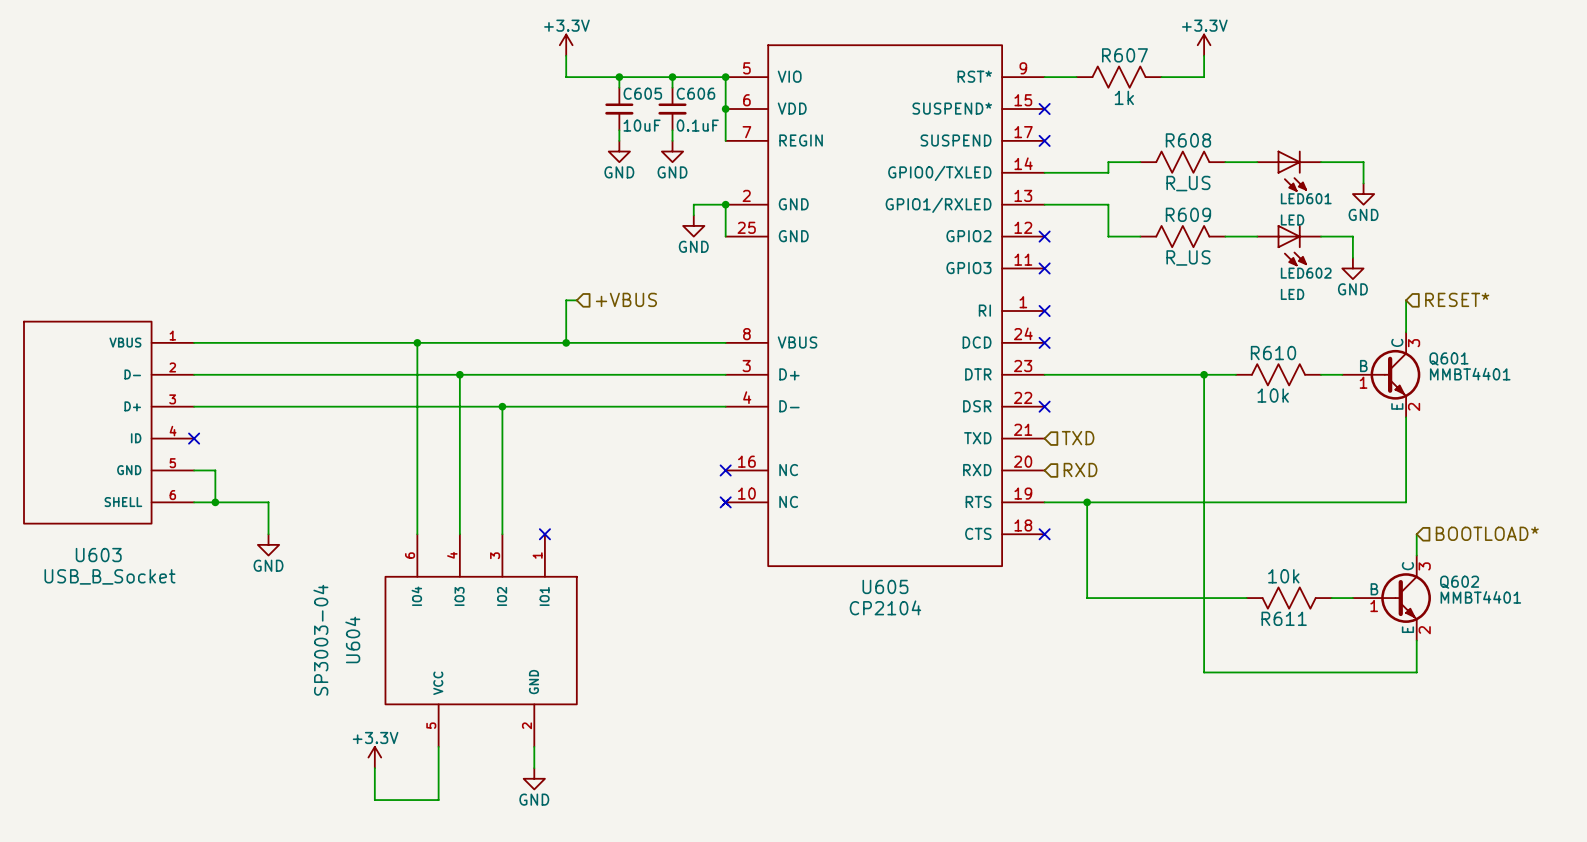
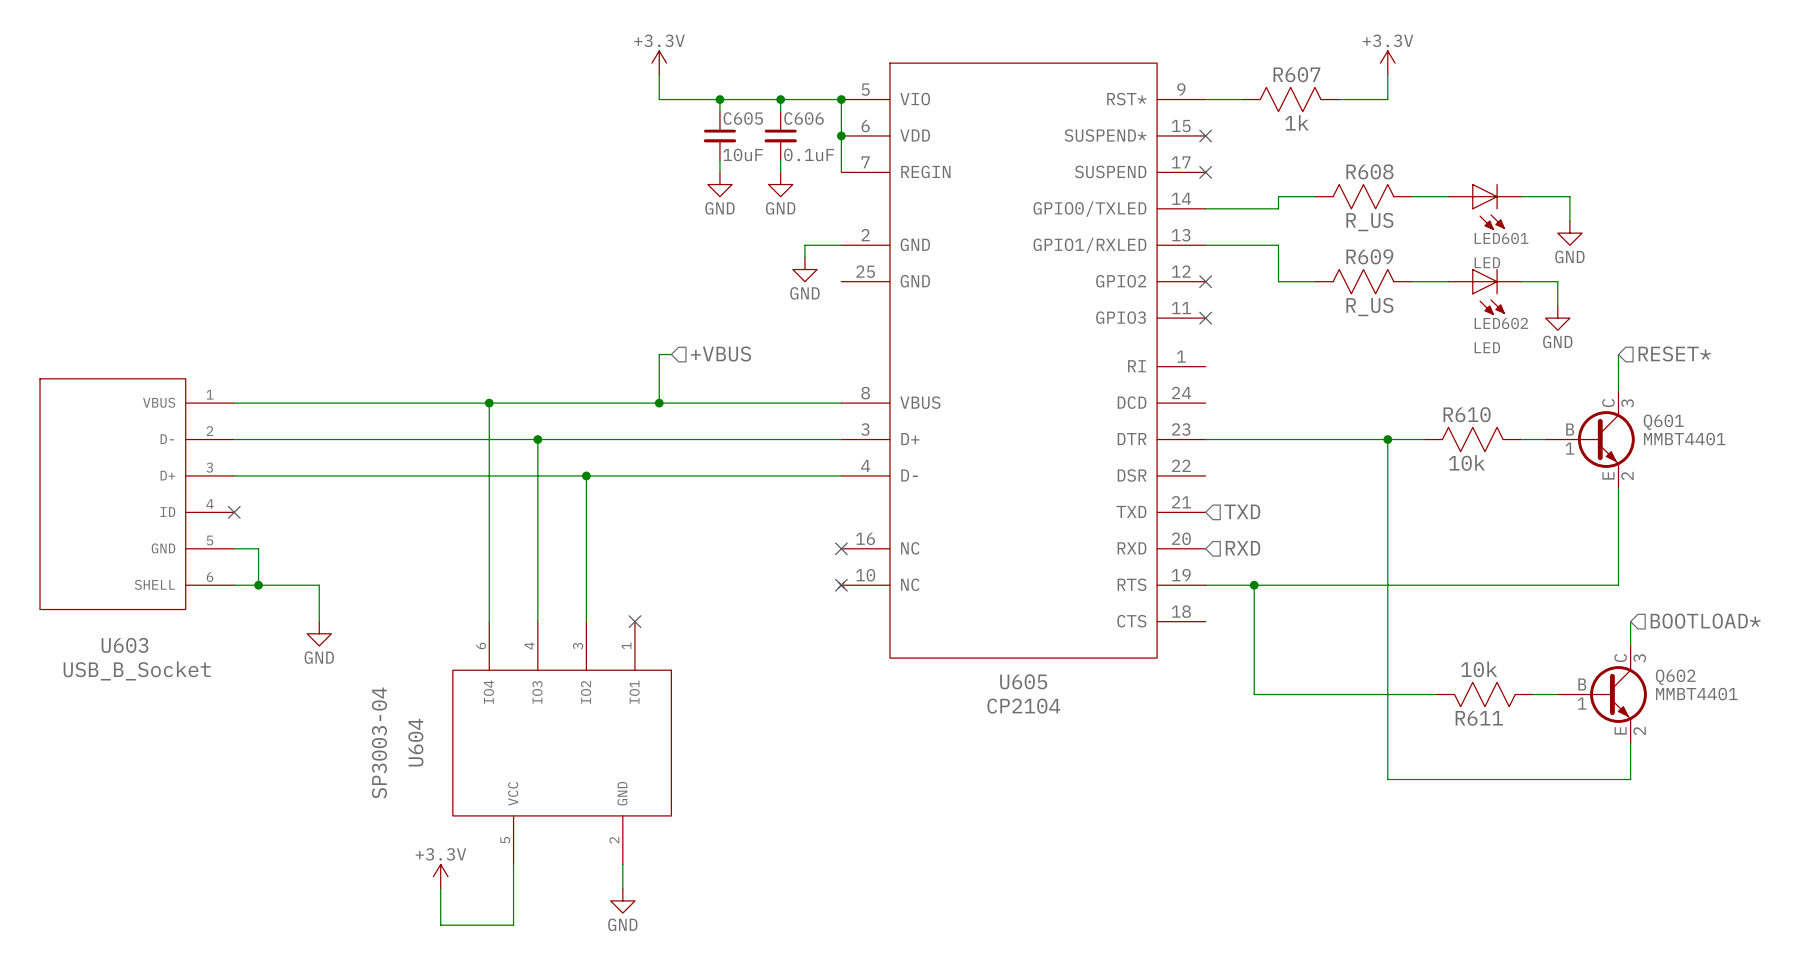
wire: (725, 204) (725, 236) -> none
junction: (725, 204) -> none
no-connect mark: (1044, 311) -> none
no-connect mark: (1044, 342) -> none
no-connect mark: (1044, 406) -> none
no-connect mark: (1044, 534) -> none

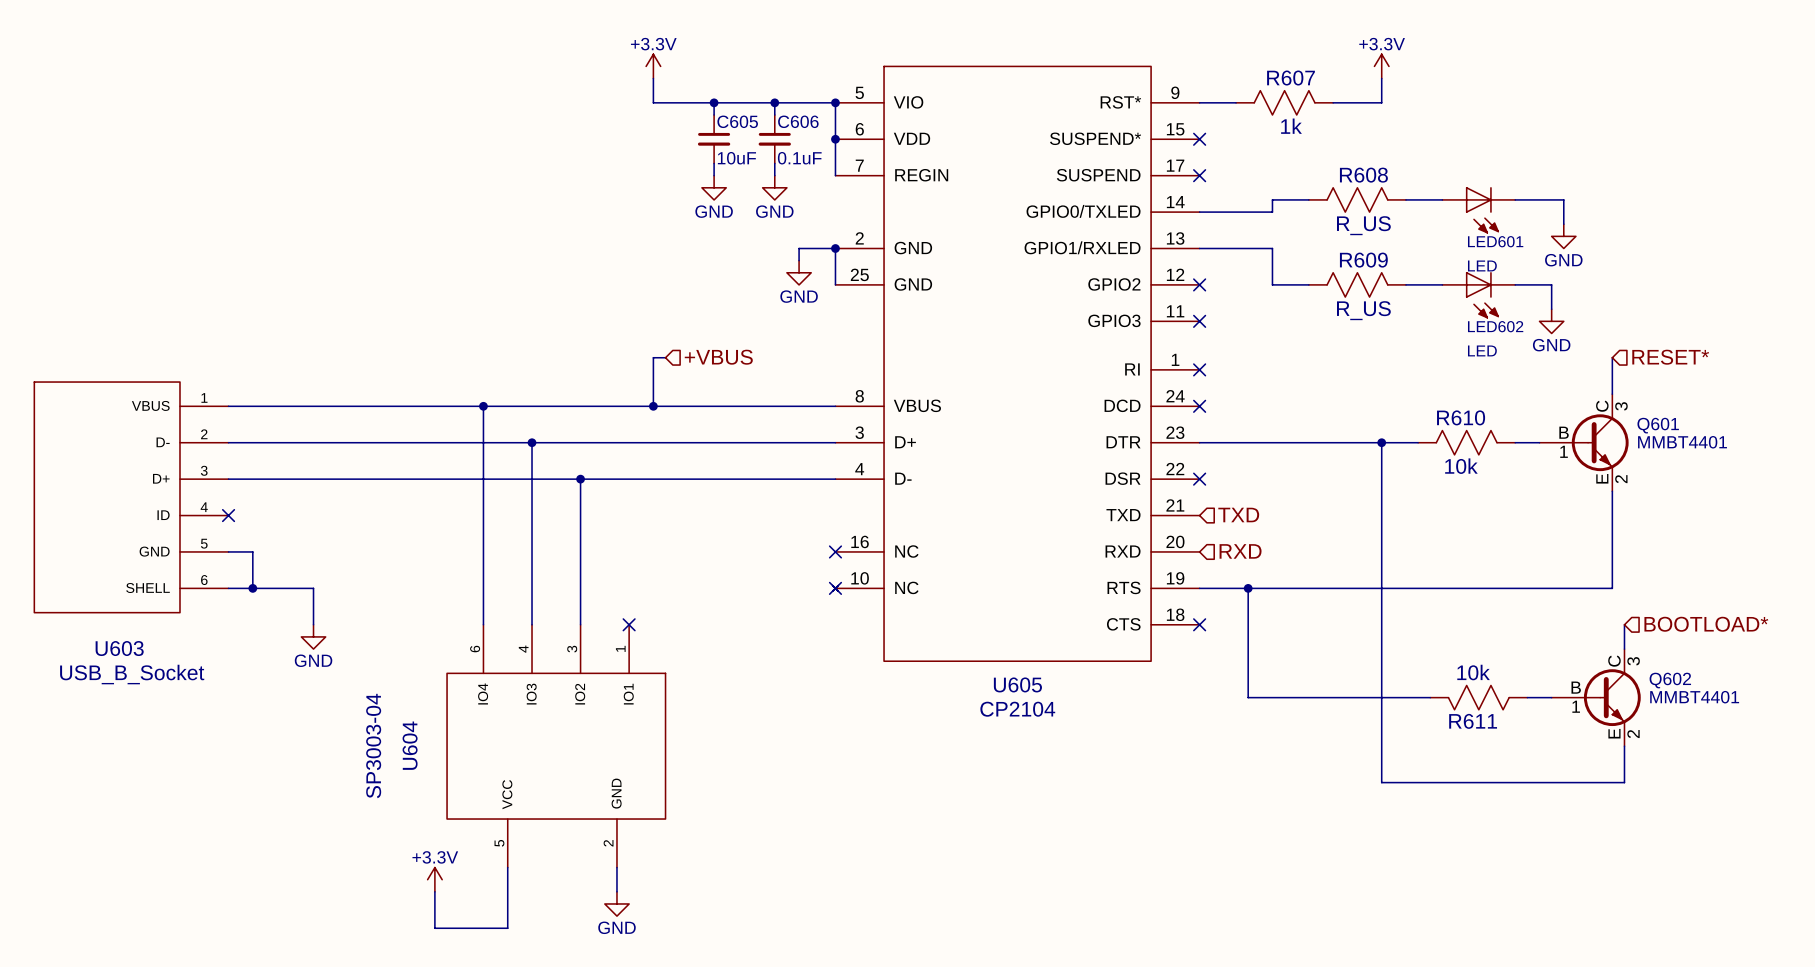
wire: none -> (835, 248) (835, 284)
junction: none -> (835, 248)
no-connect mark: none -> (1199, 369)
no-connect mark: none -> (1199, 406)
no-connect mark: none -> (1199, 479)
no-connect mark: none -> (1199, 624)

